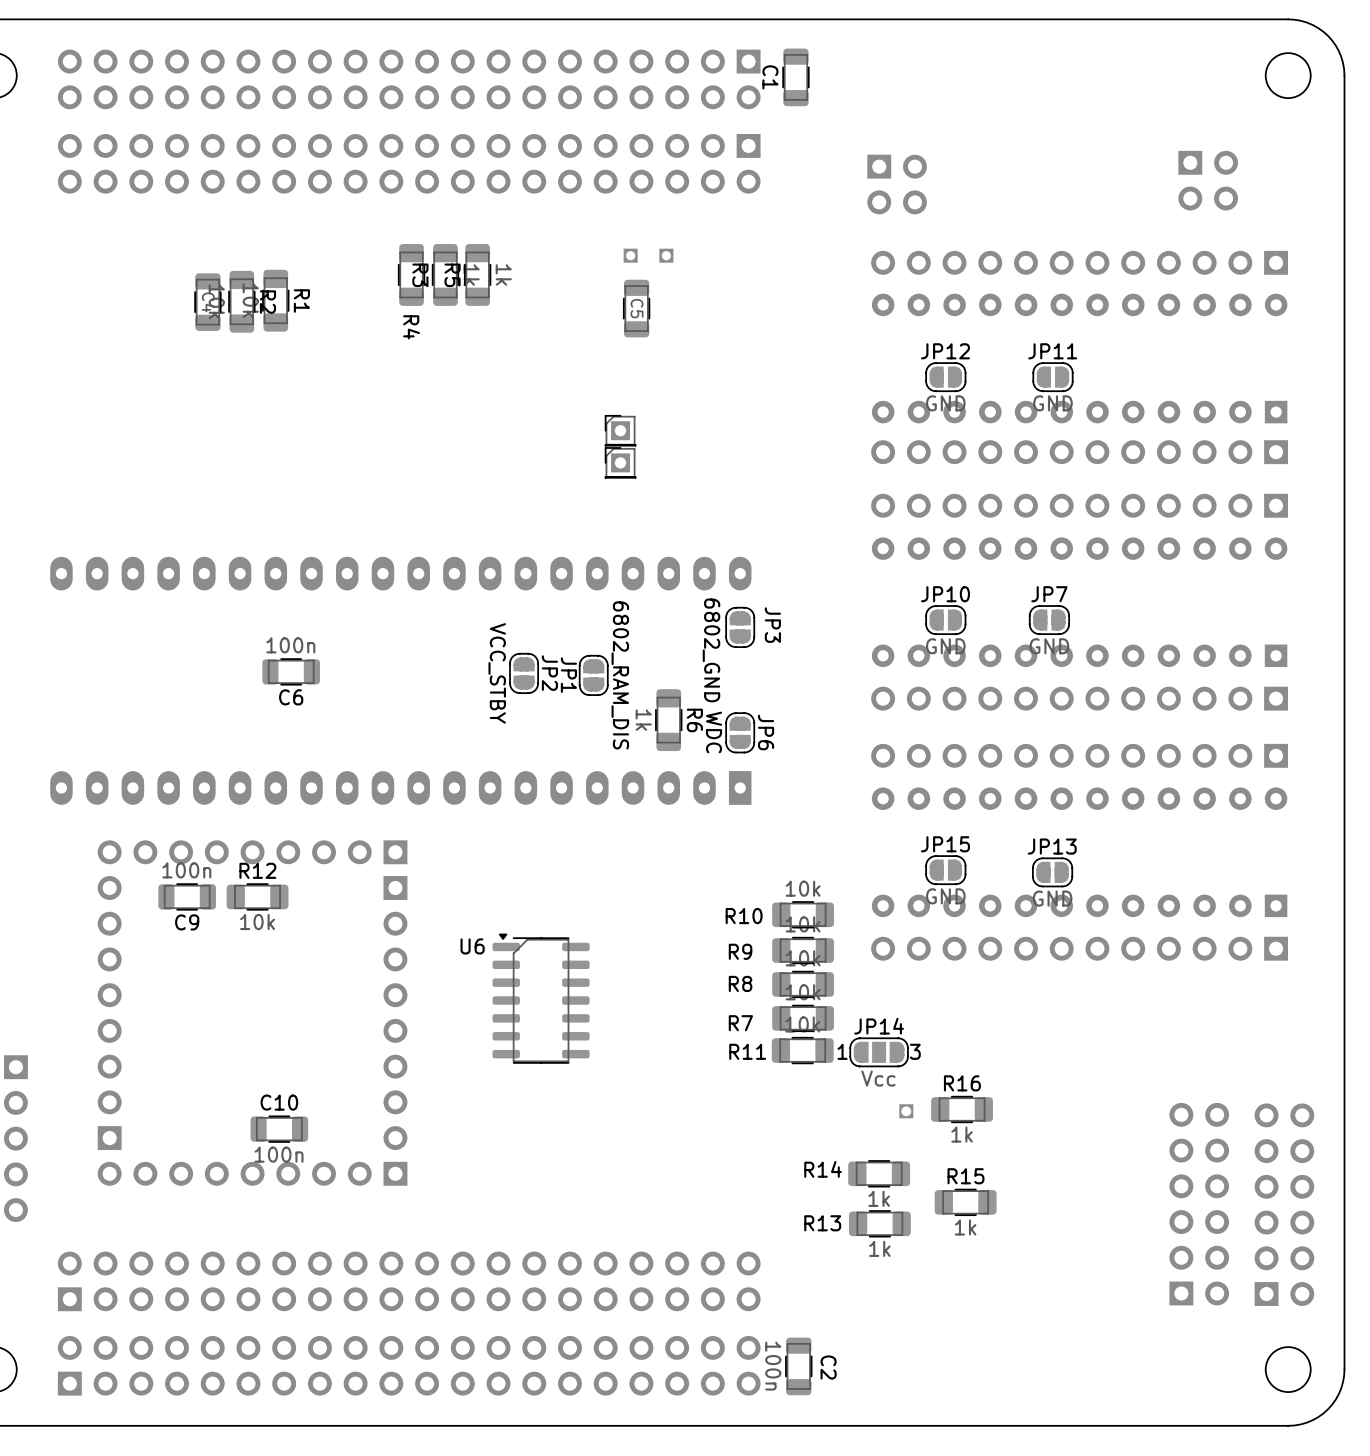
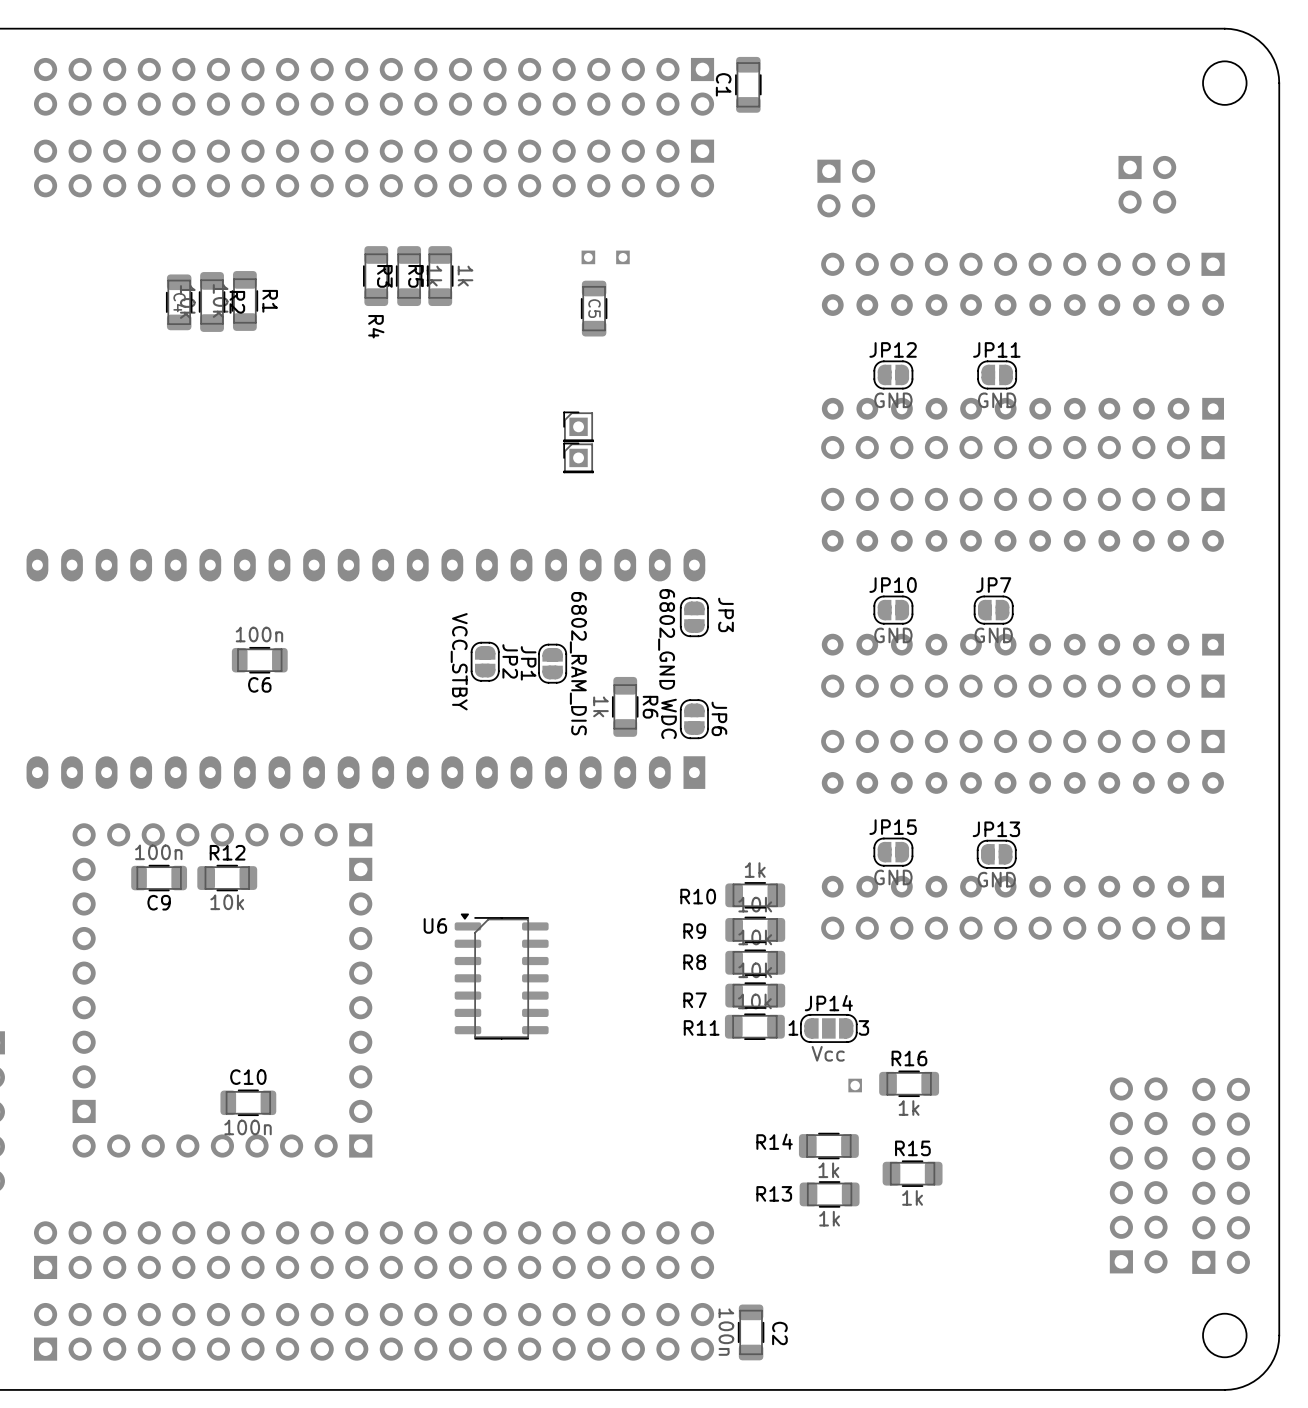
R10 value: 10k (803, 888) -> 1k (755, 870)

